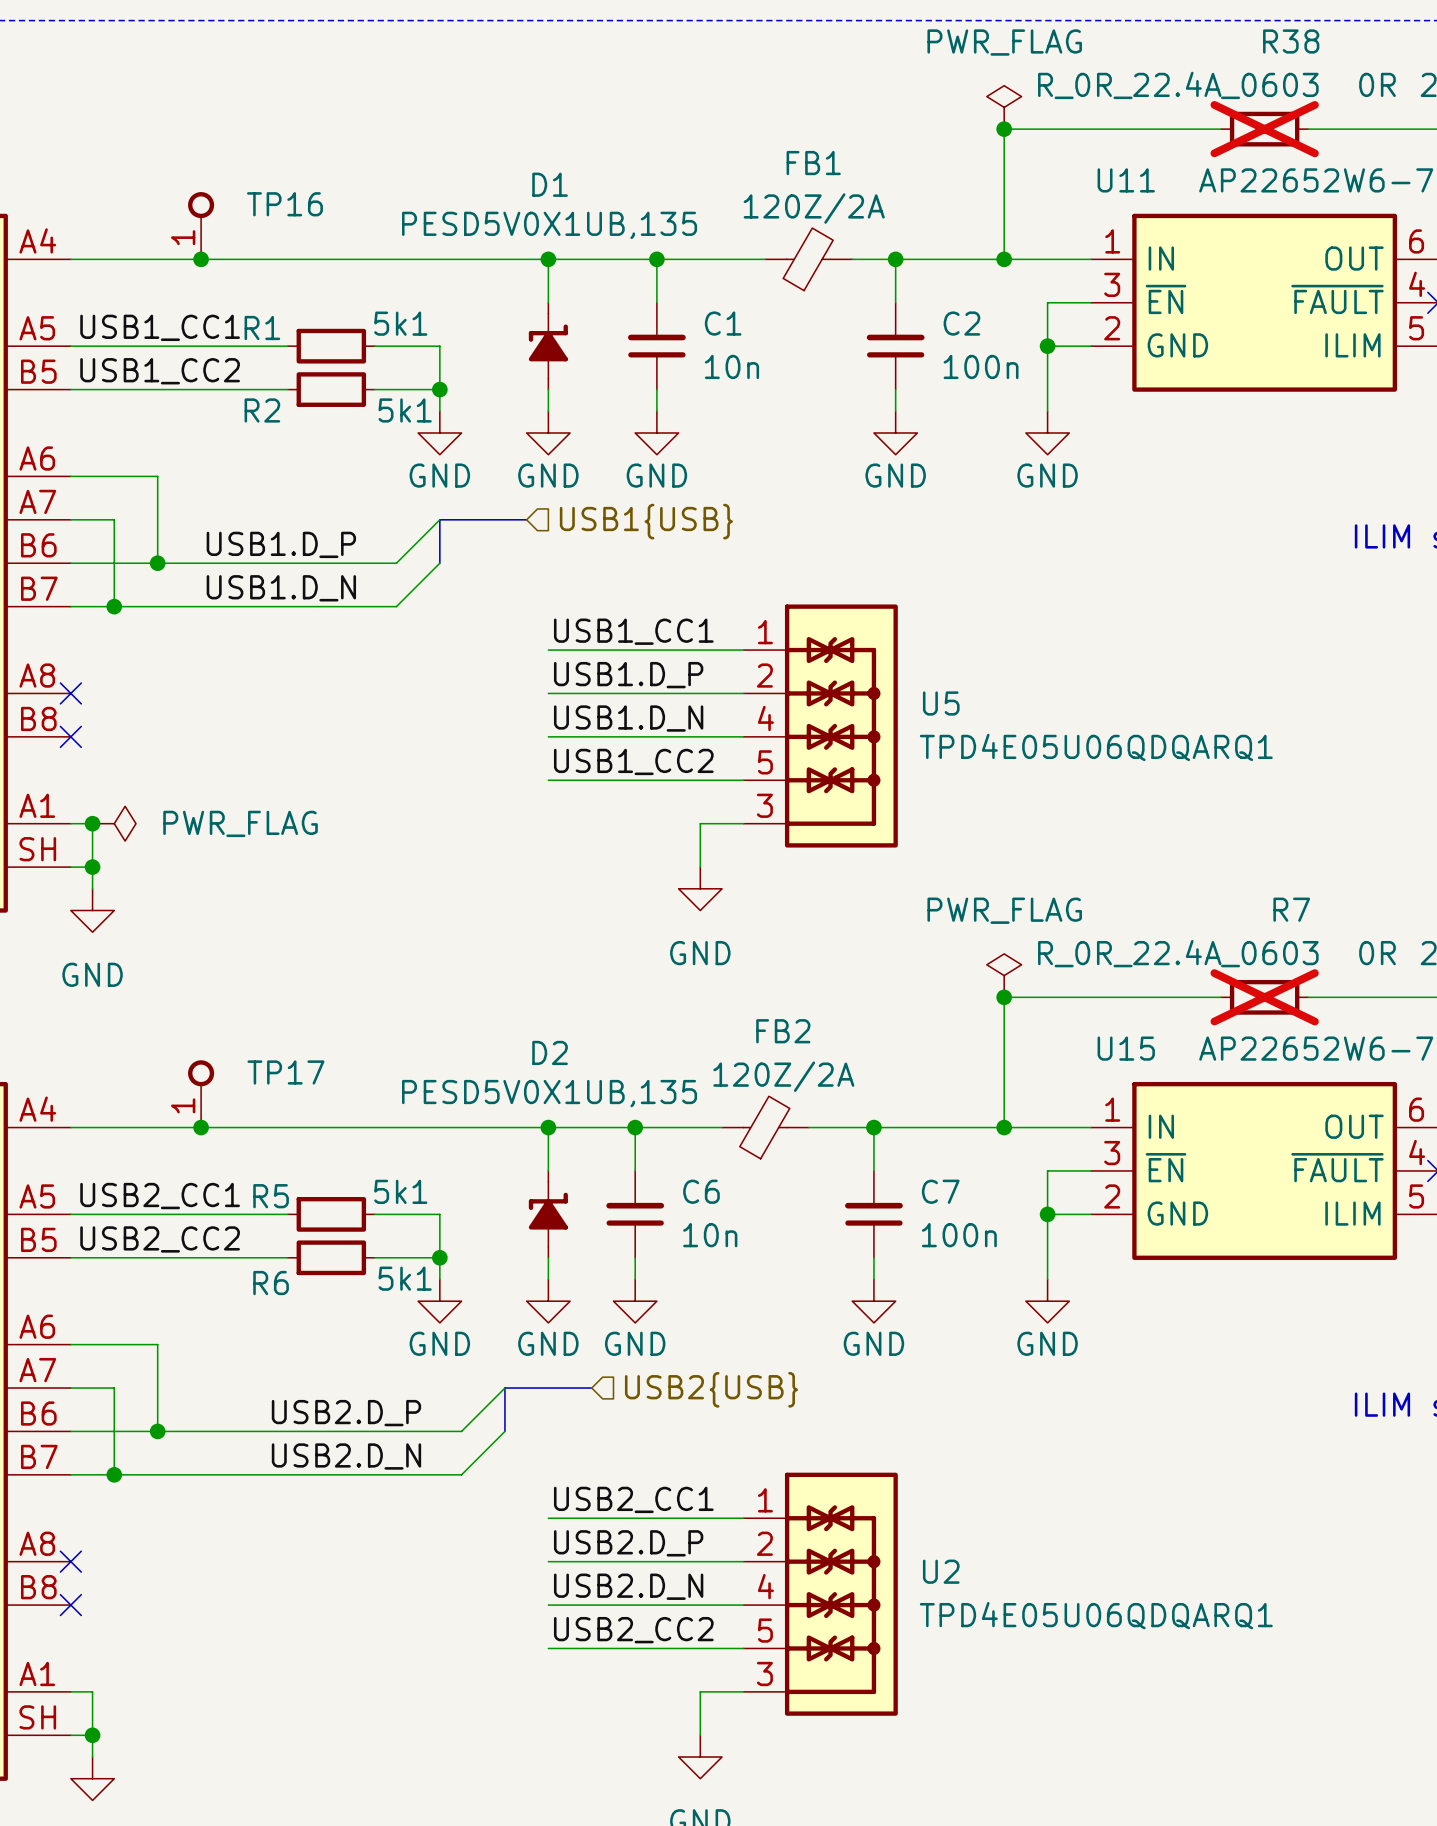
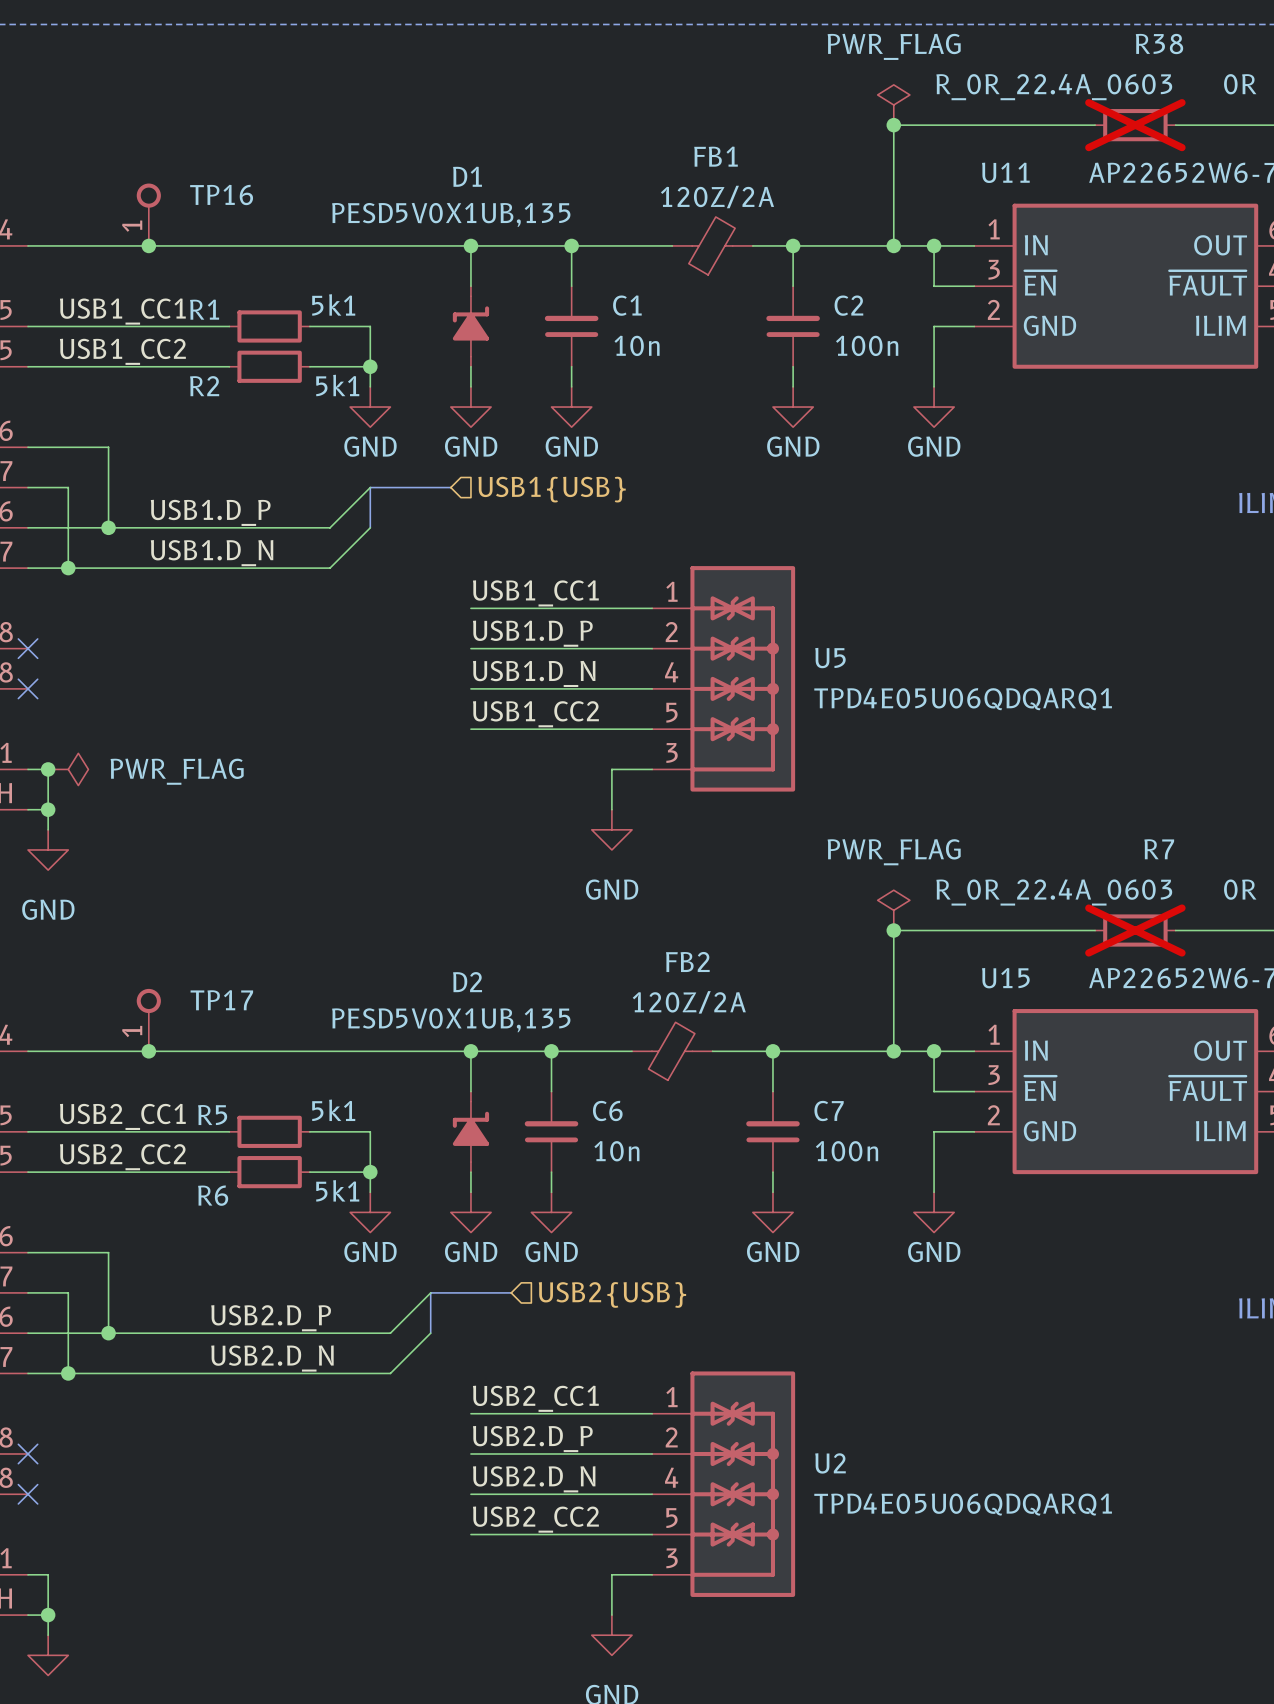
wire: (1047, 302) (1047, 346) -> (934, 286) (934, 245)
junction position: (1047, 346) -> (934, 245)
wire: (1047, 1170) (1047, 1214) -> (934, 1091) (934, 1051)
junction position: (1047, 1214) -> (934, 1051)

